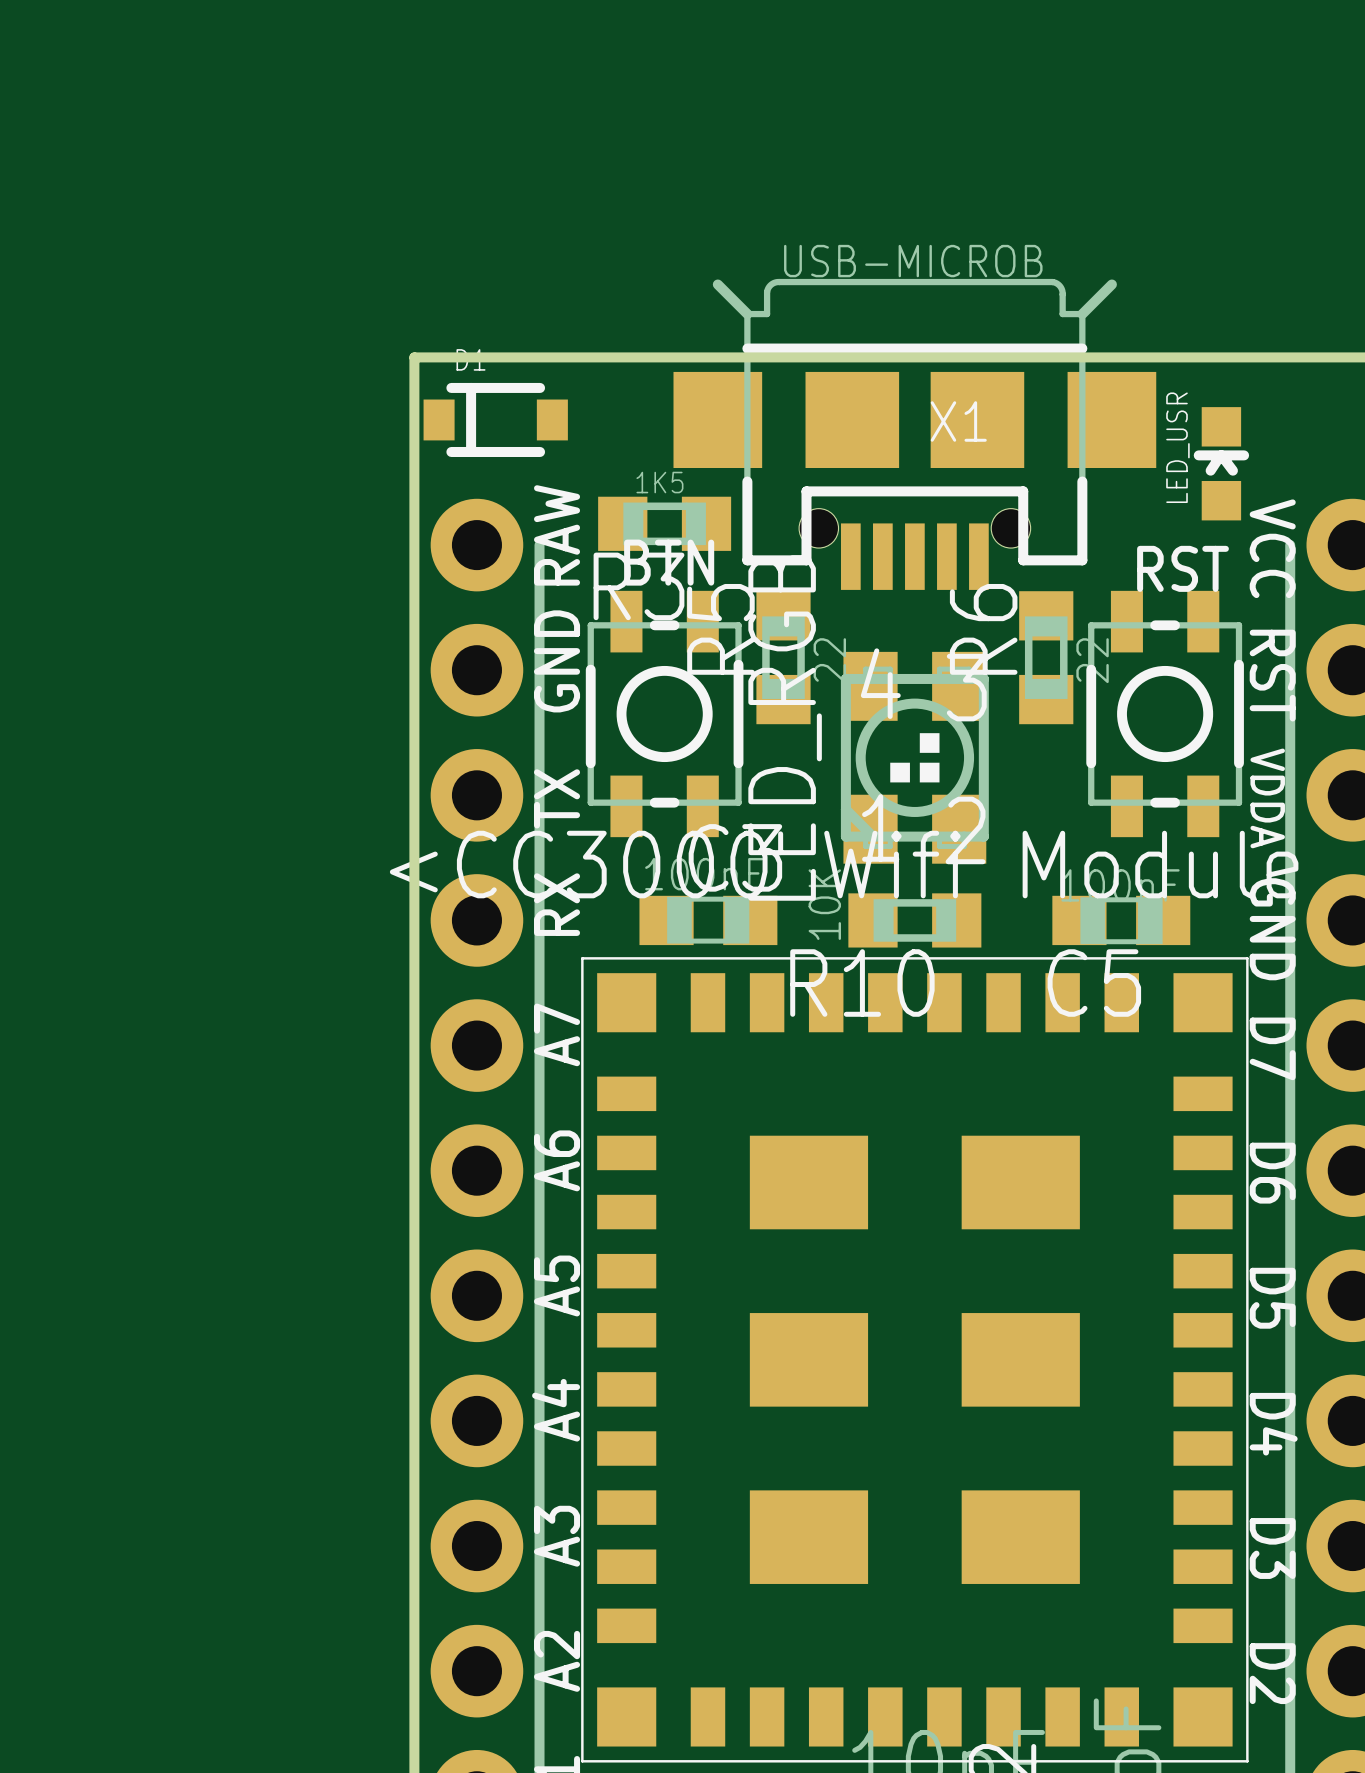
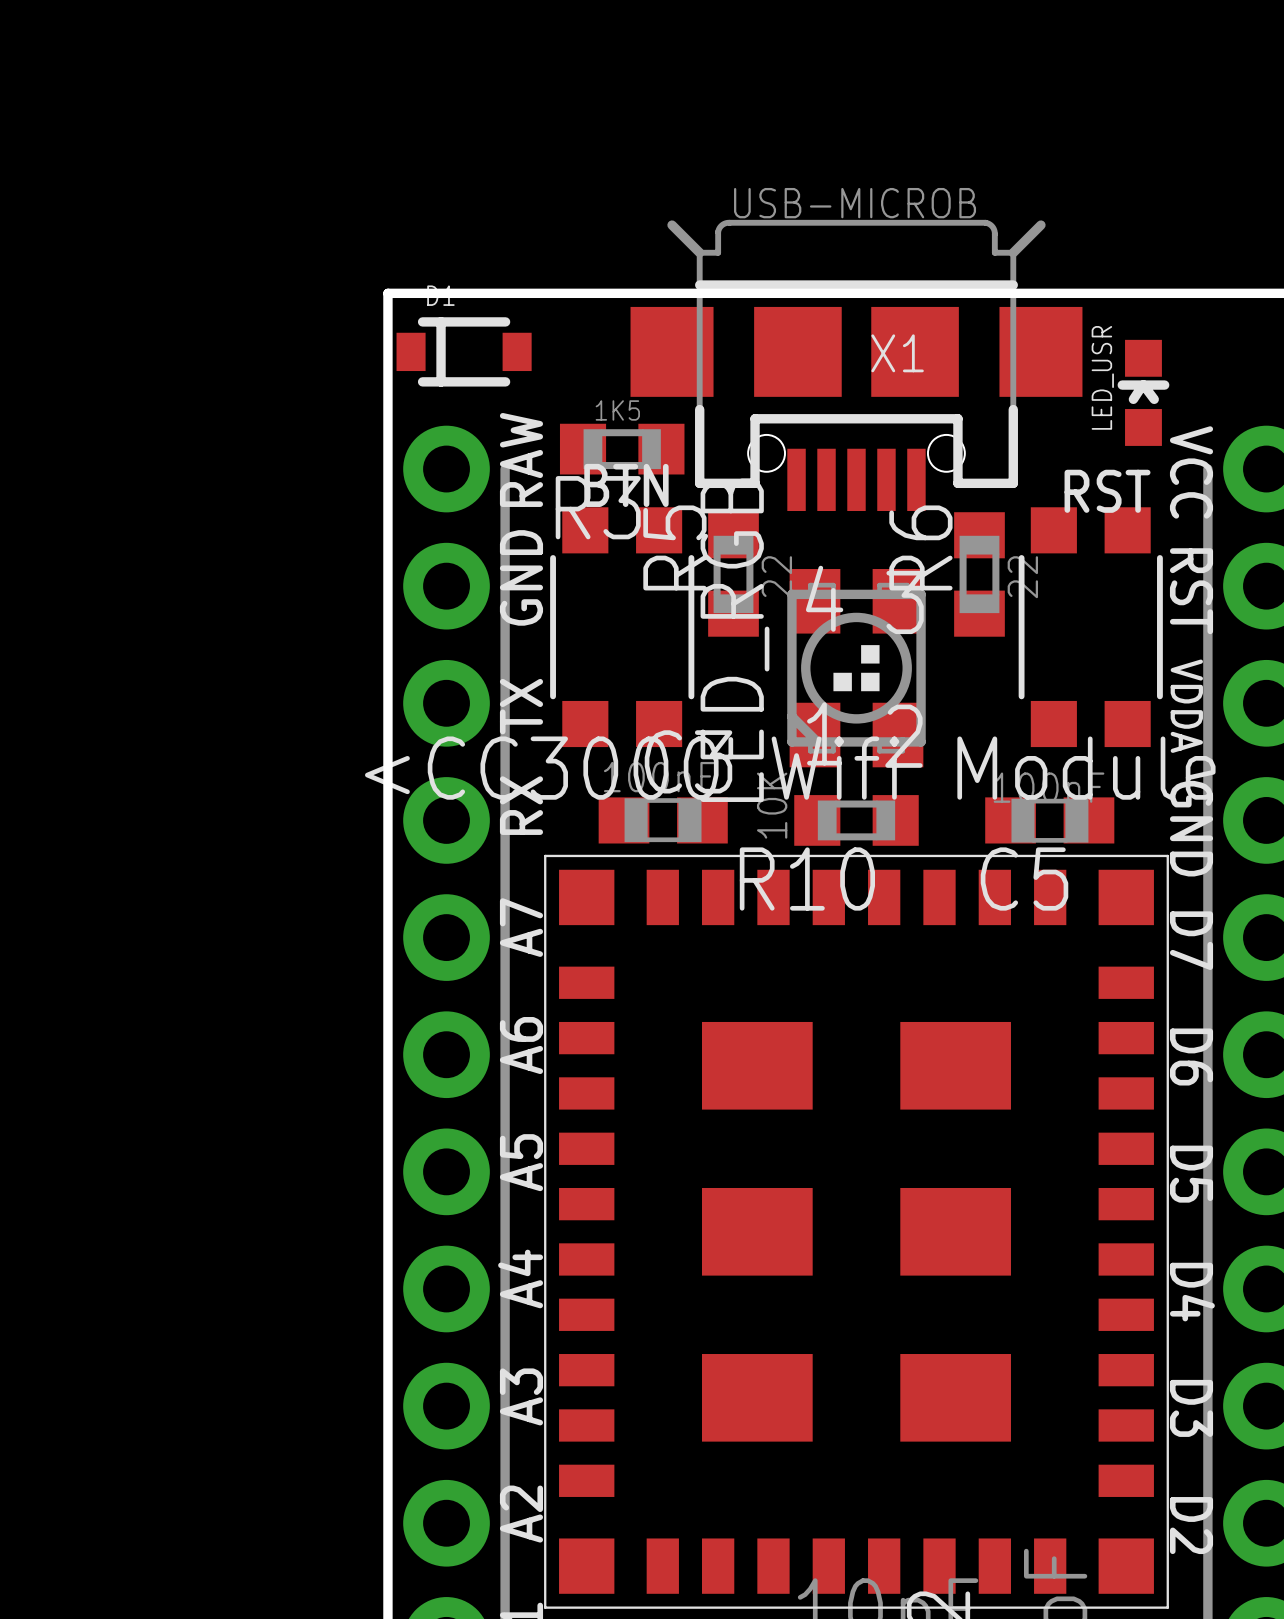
part footprint: [585, 590, 744, 838] -> [550, 507, 695, 748]
part footprint: [1086, 590, 1244, 838] -> [1018, 507, 1163, 748]

